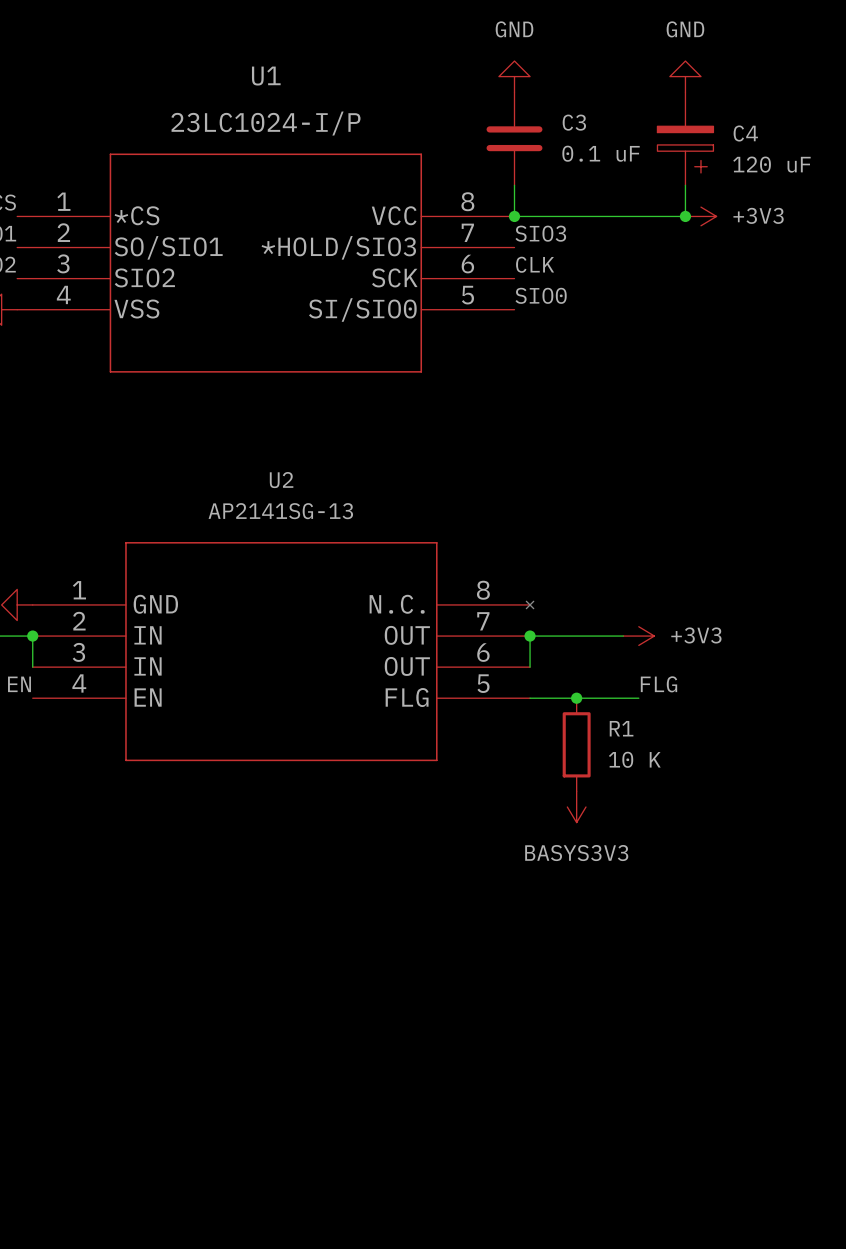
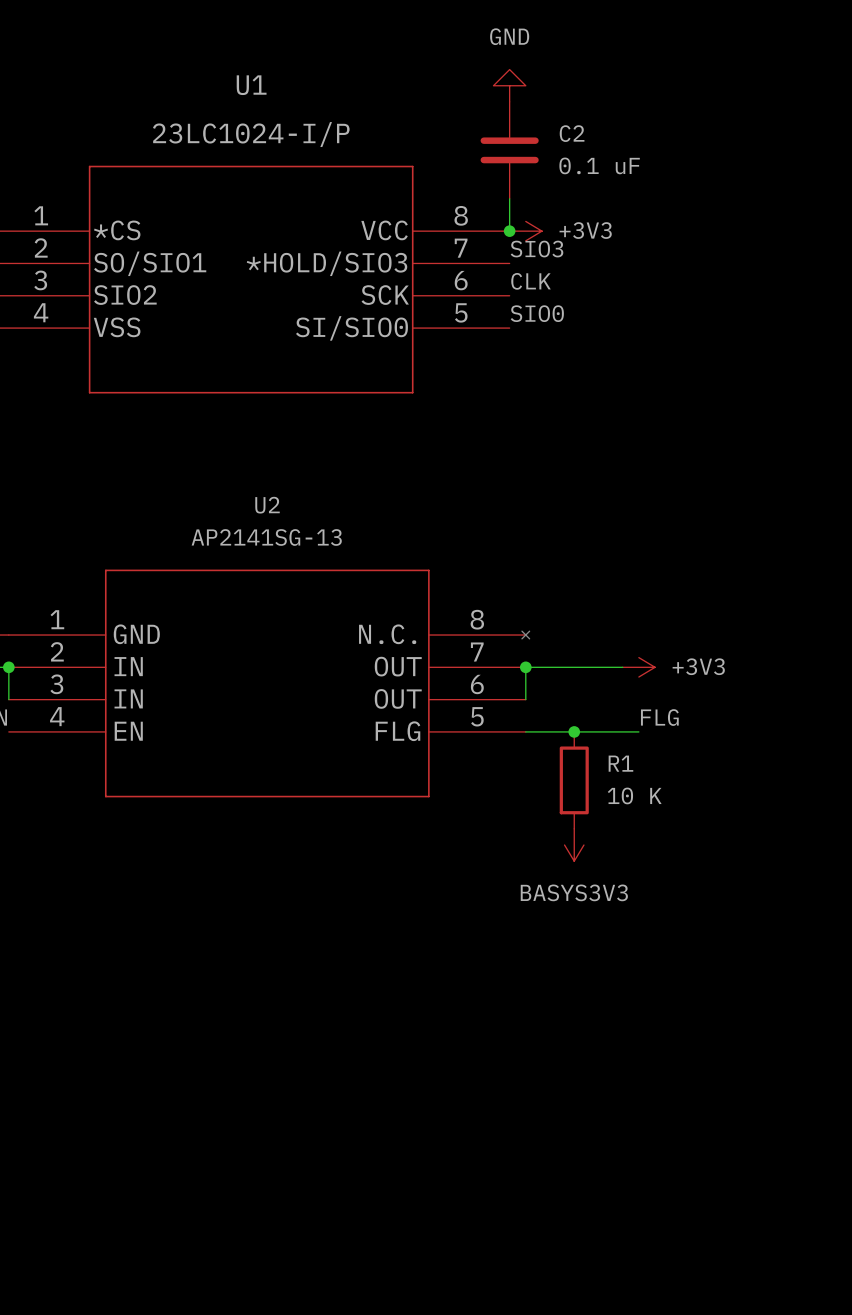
power symbol: GND (685, 76) -> none
C3 name: C3 (574, 122) -> C2 (572, 133)
C4: 120 uF (685, 138) -> none
wire: (685, 185) (685, 216) (514, 216) -> none
junction: (685, 216) -> none
power symbol position: +3V3 (700, 216) -> +3V3 (525, 231)

